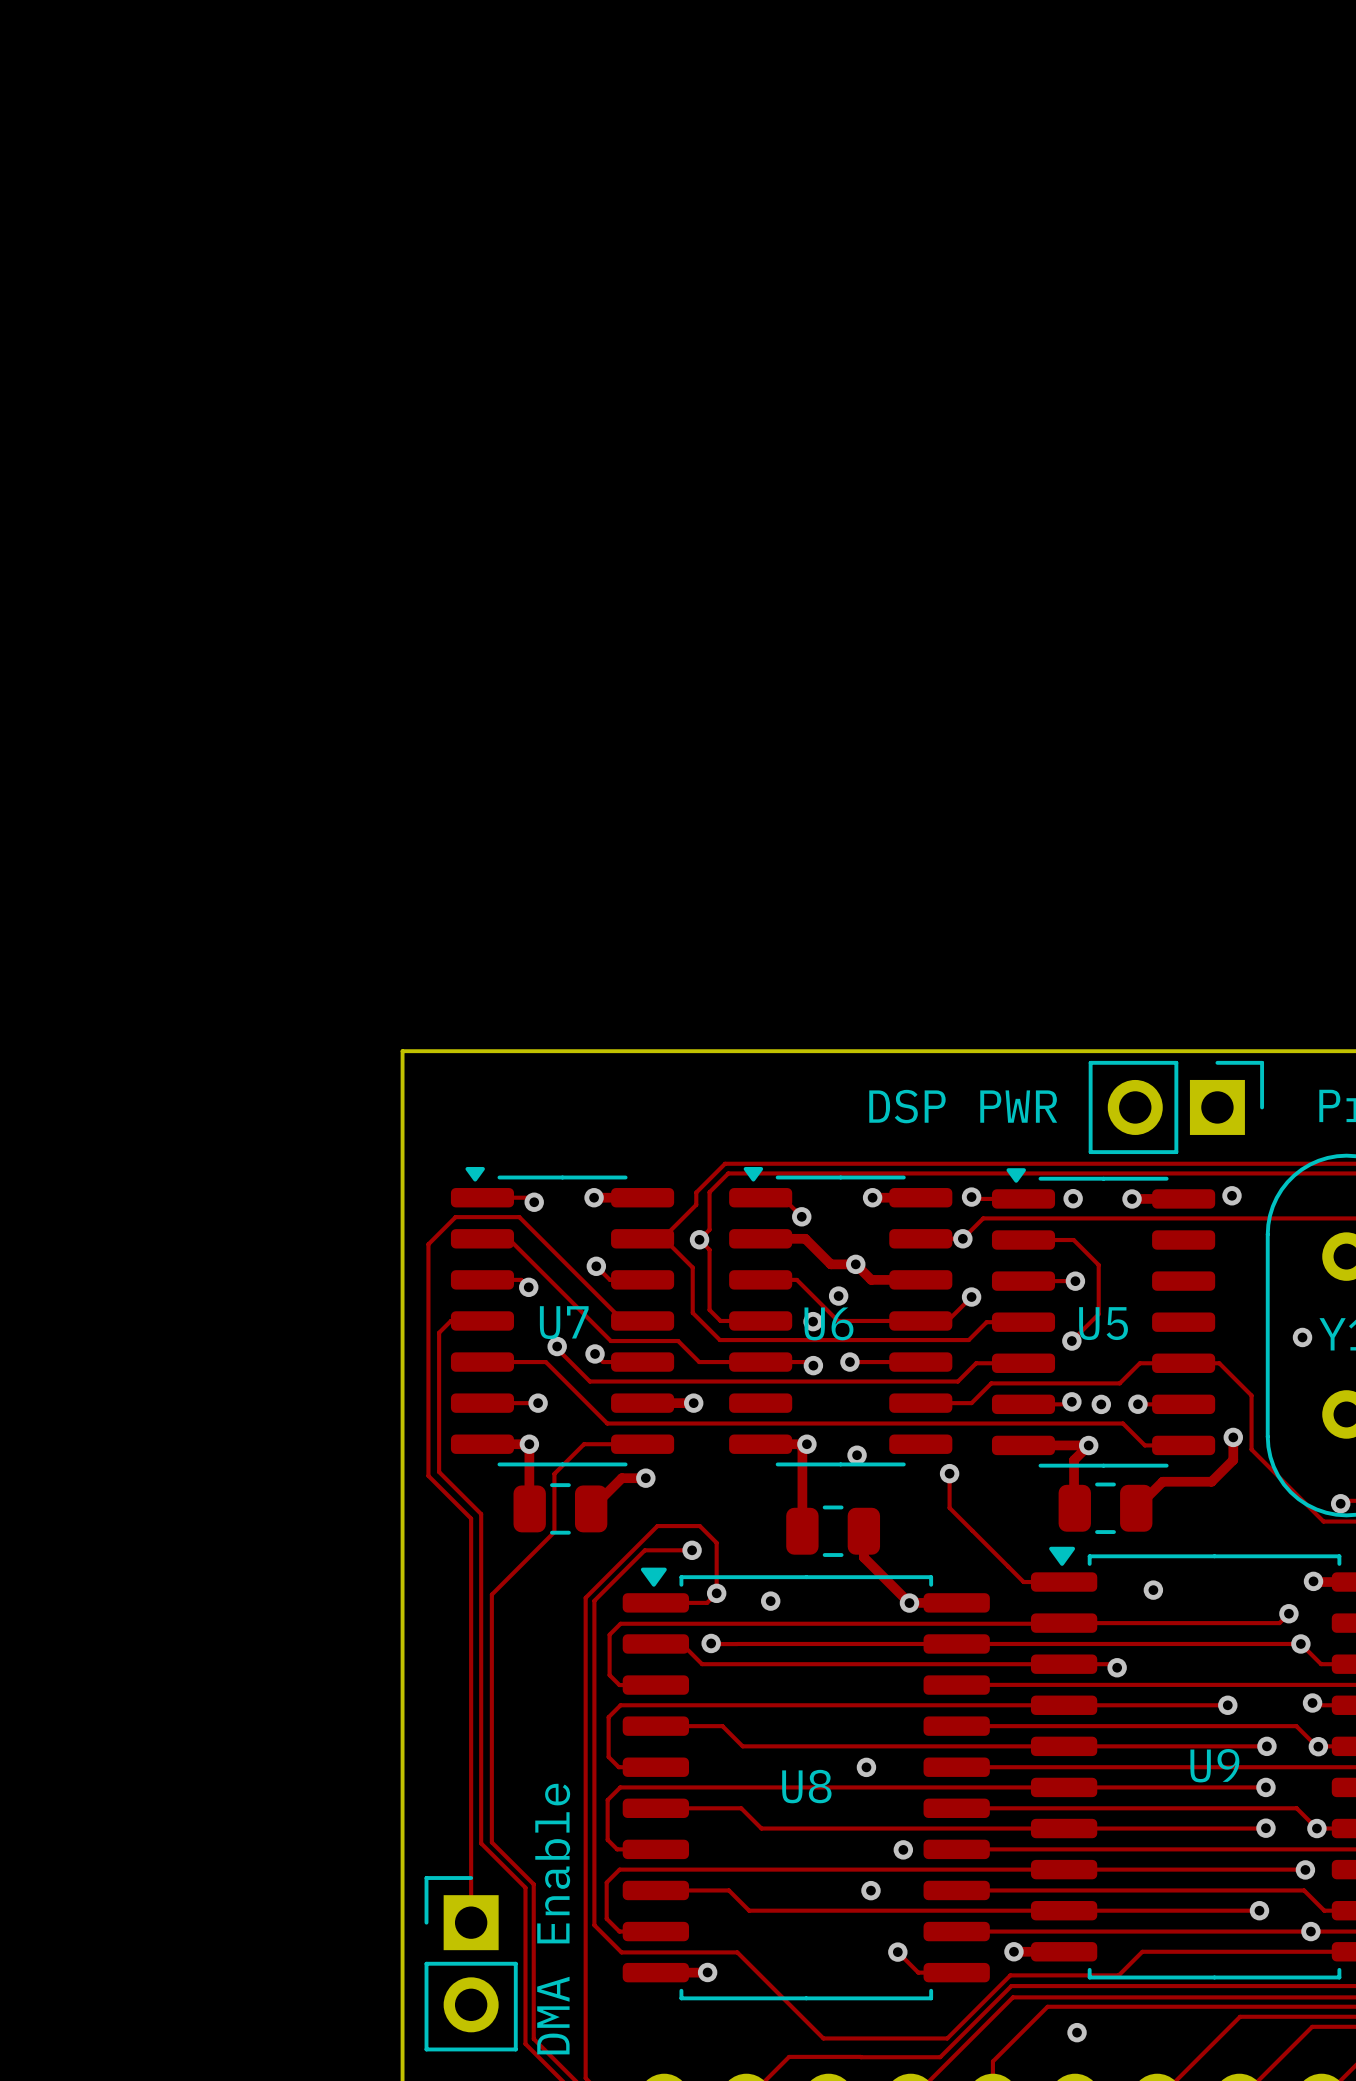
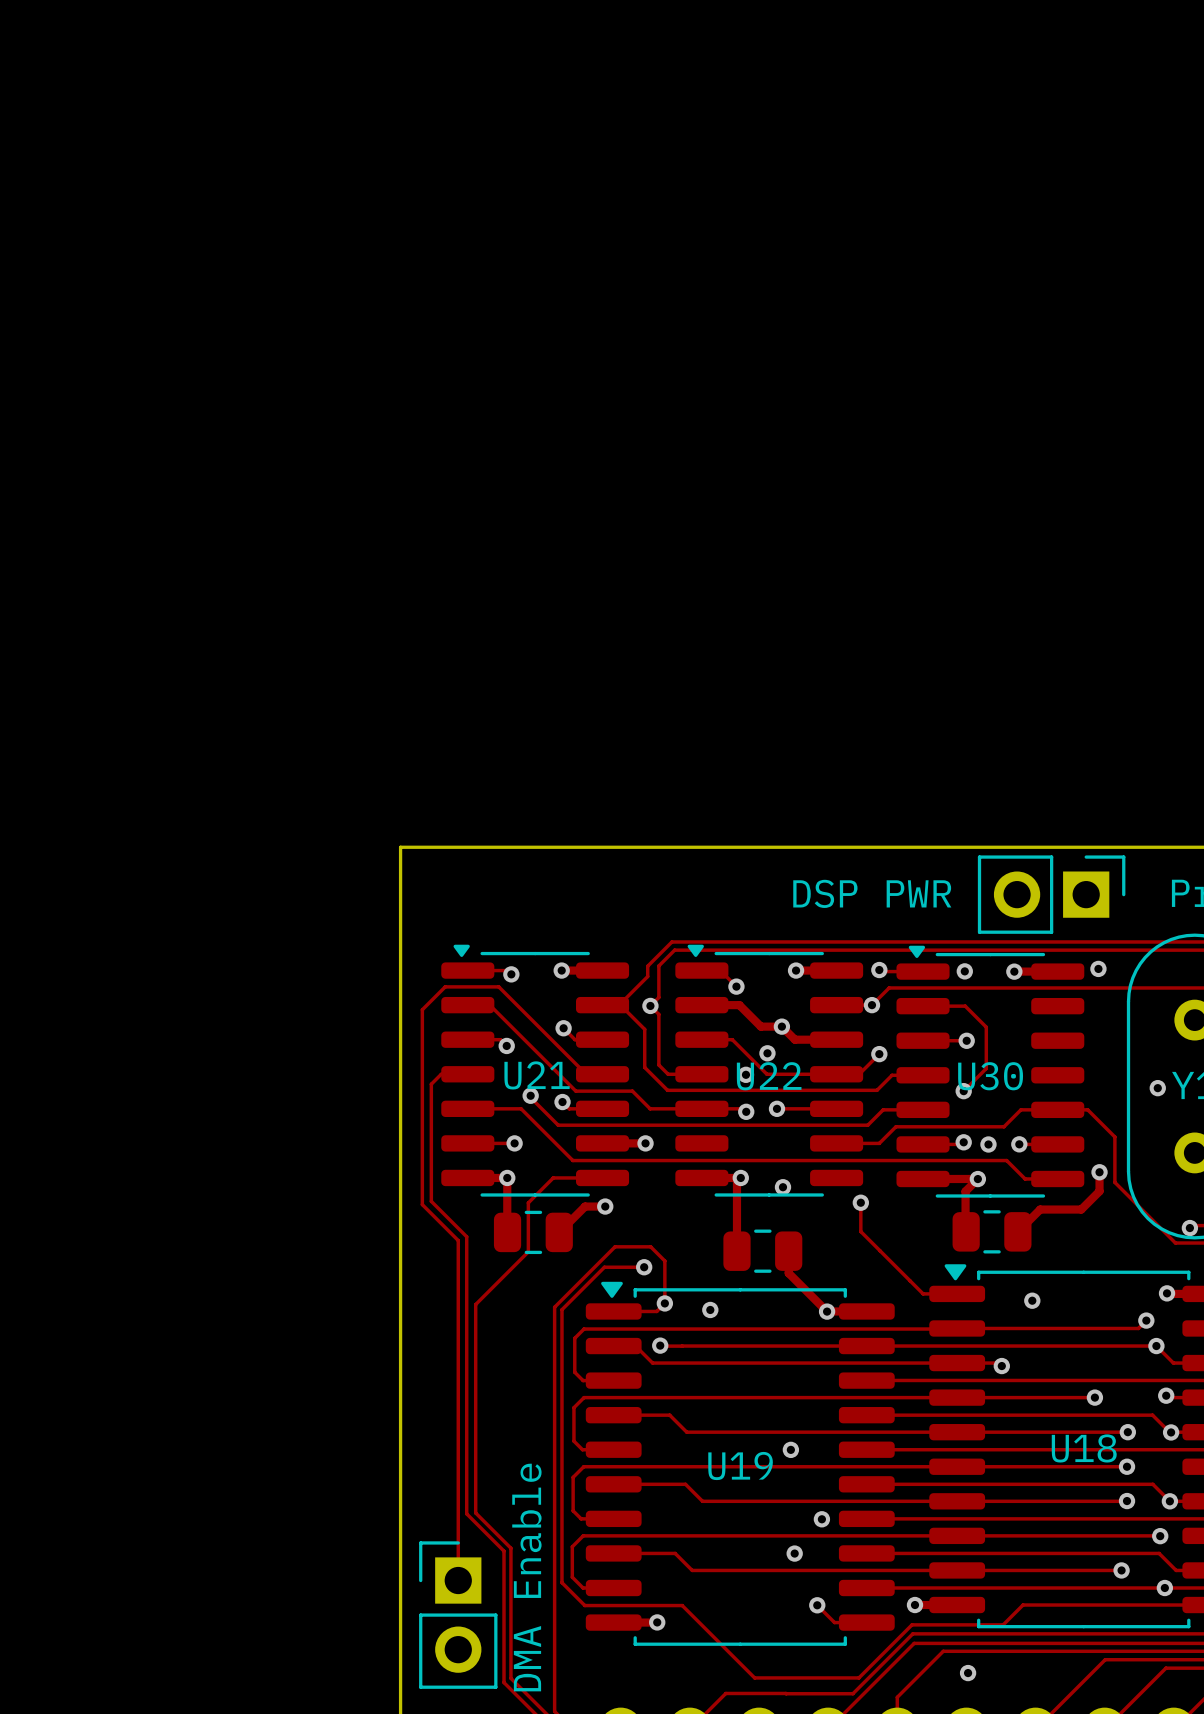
U7 name: U7 (564, 1322) -> U21 (537, 1075)
U6 name: U6 (828, 1323) -> U22 (769, 1076)
U5 name: U5 (1103, 1323) -> U30 (990, 1076)
U9 name: U9 (1214, 1765) -> U18 (1084, 1448)
U8 name: U8 (806, 1786) -> U19 (740, 1466)

